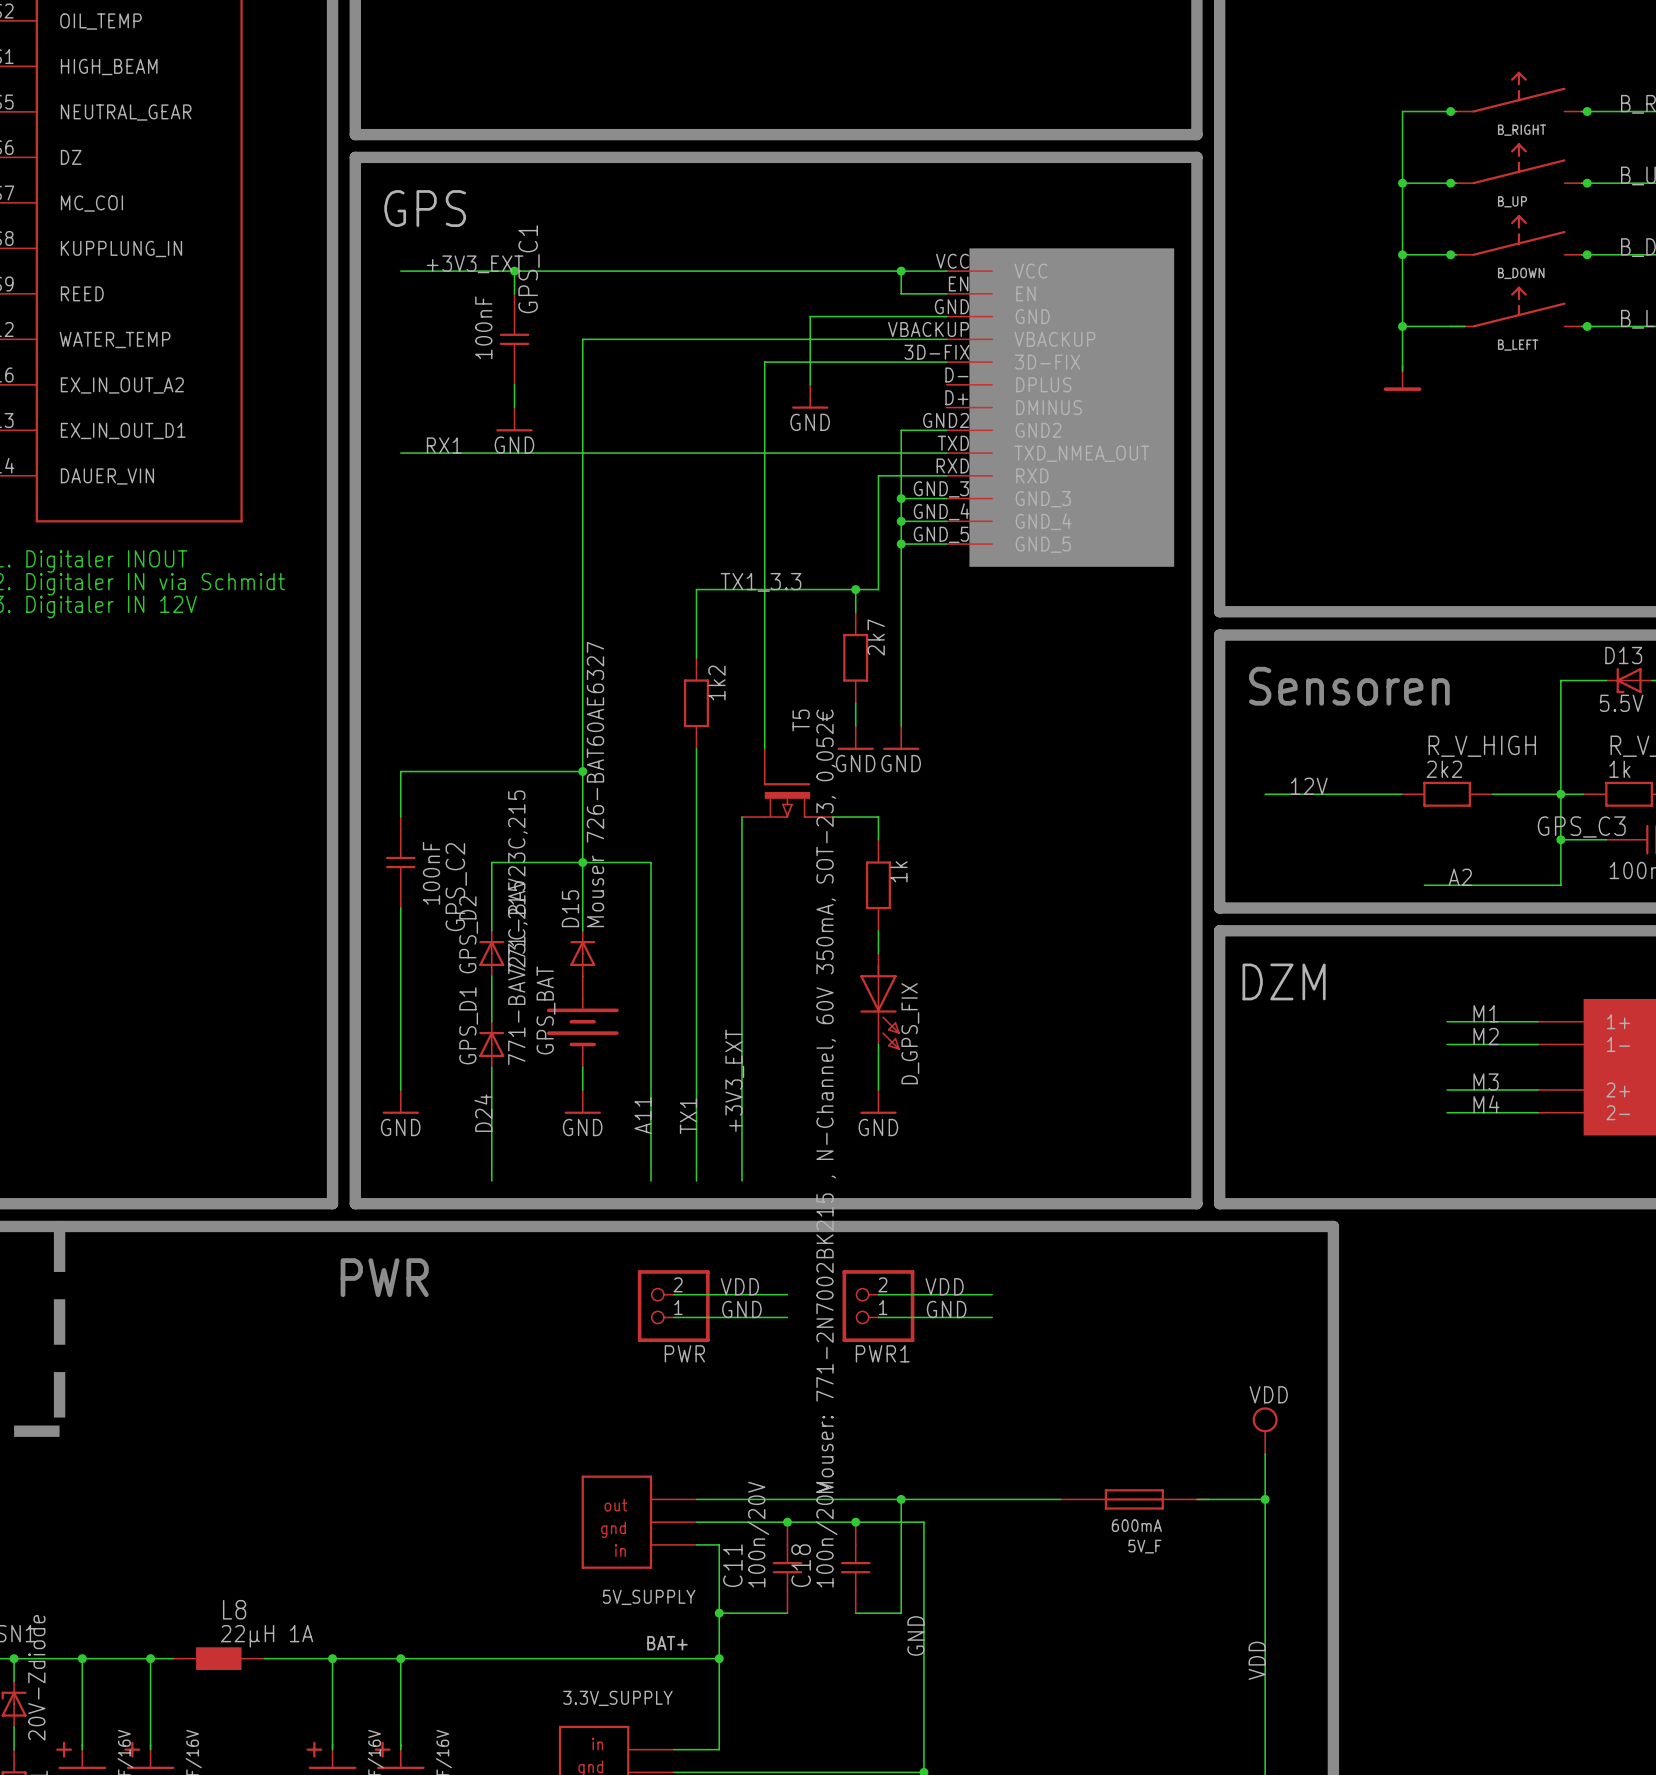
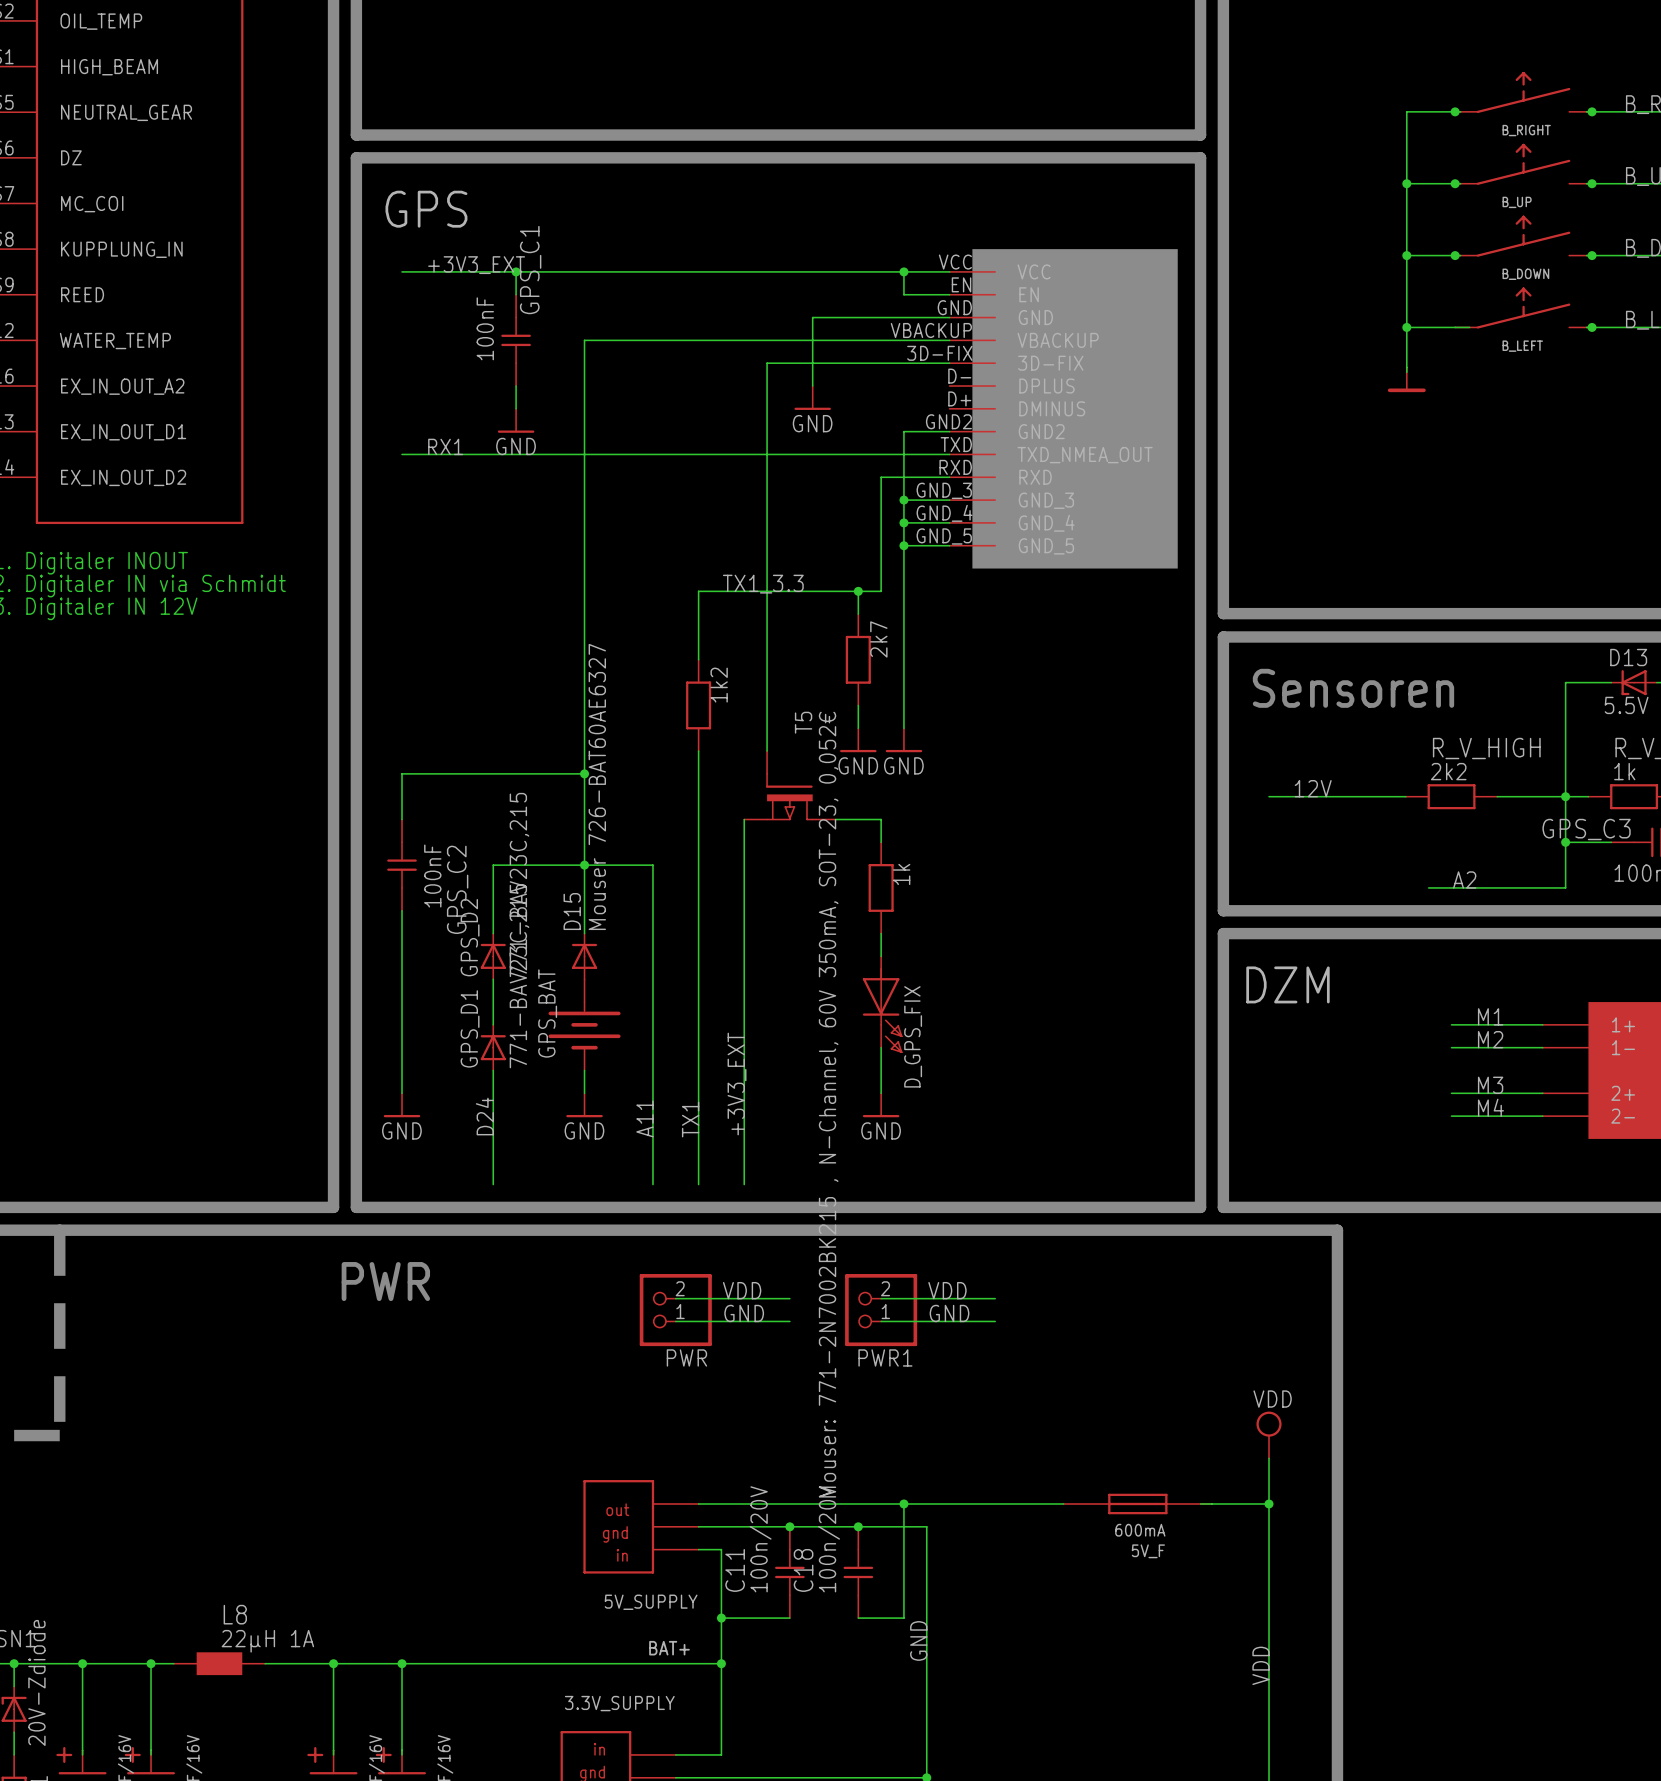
part pin name: DAUER_VIN (107, 476) -> EX_IN_OUT_D2 (123, 477)

